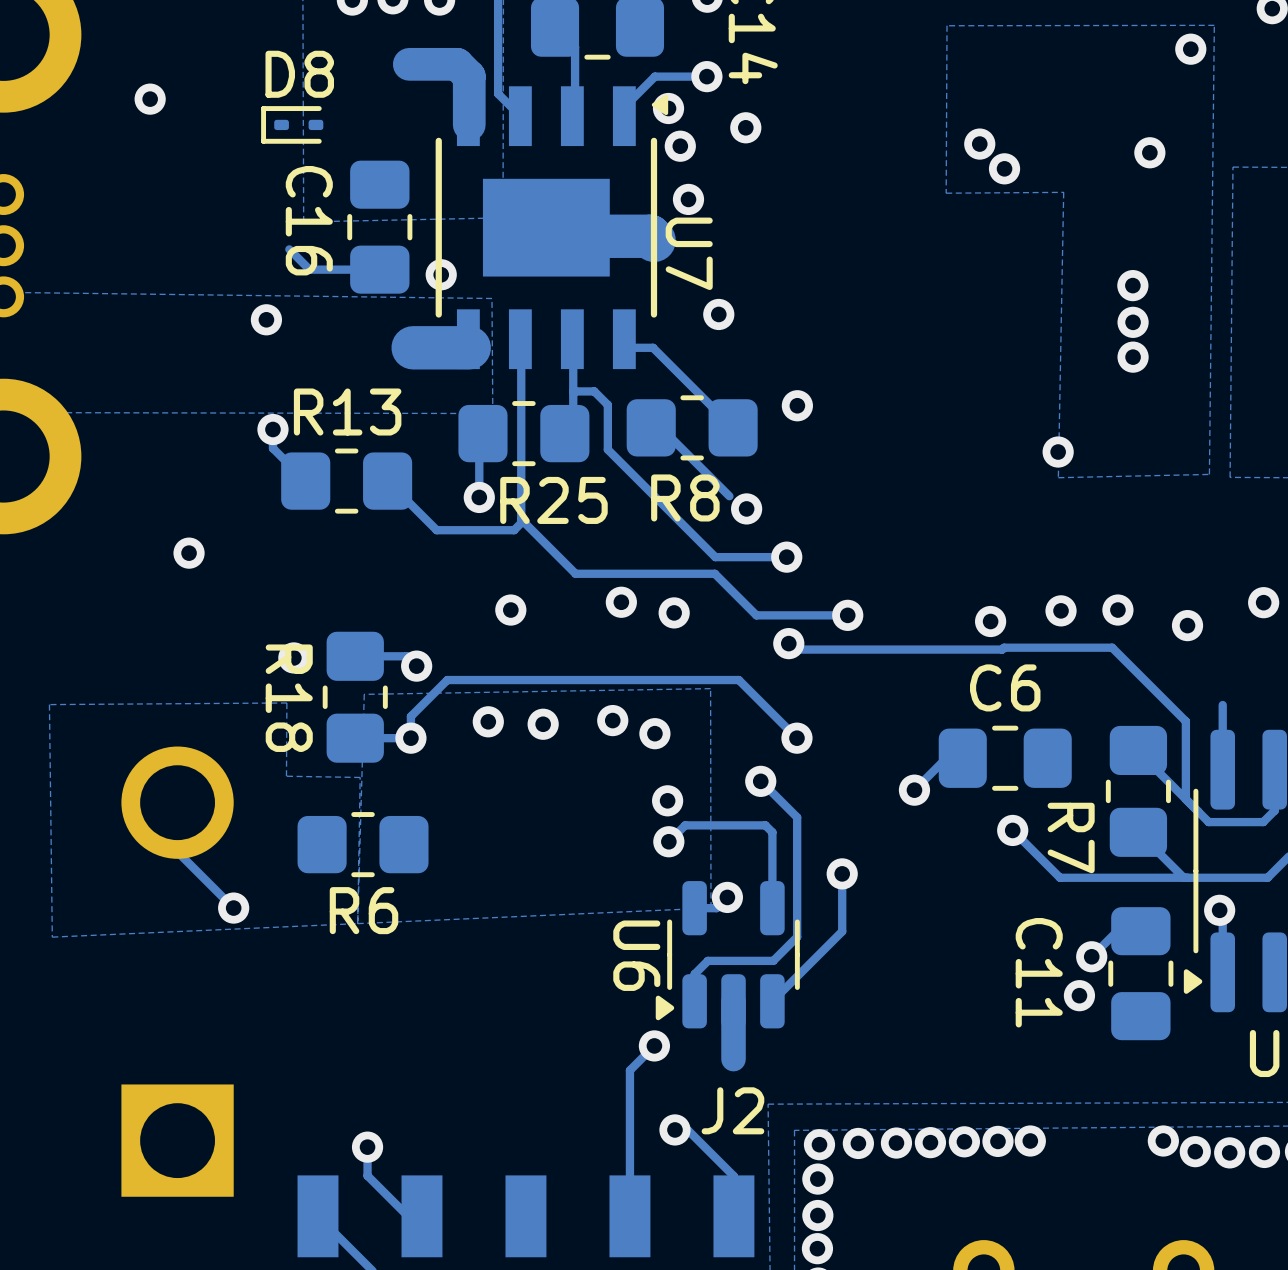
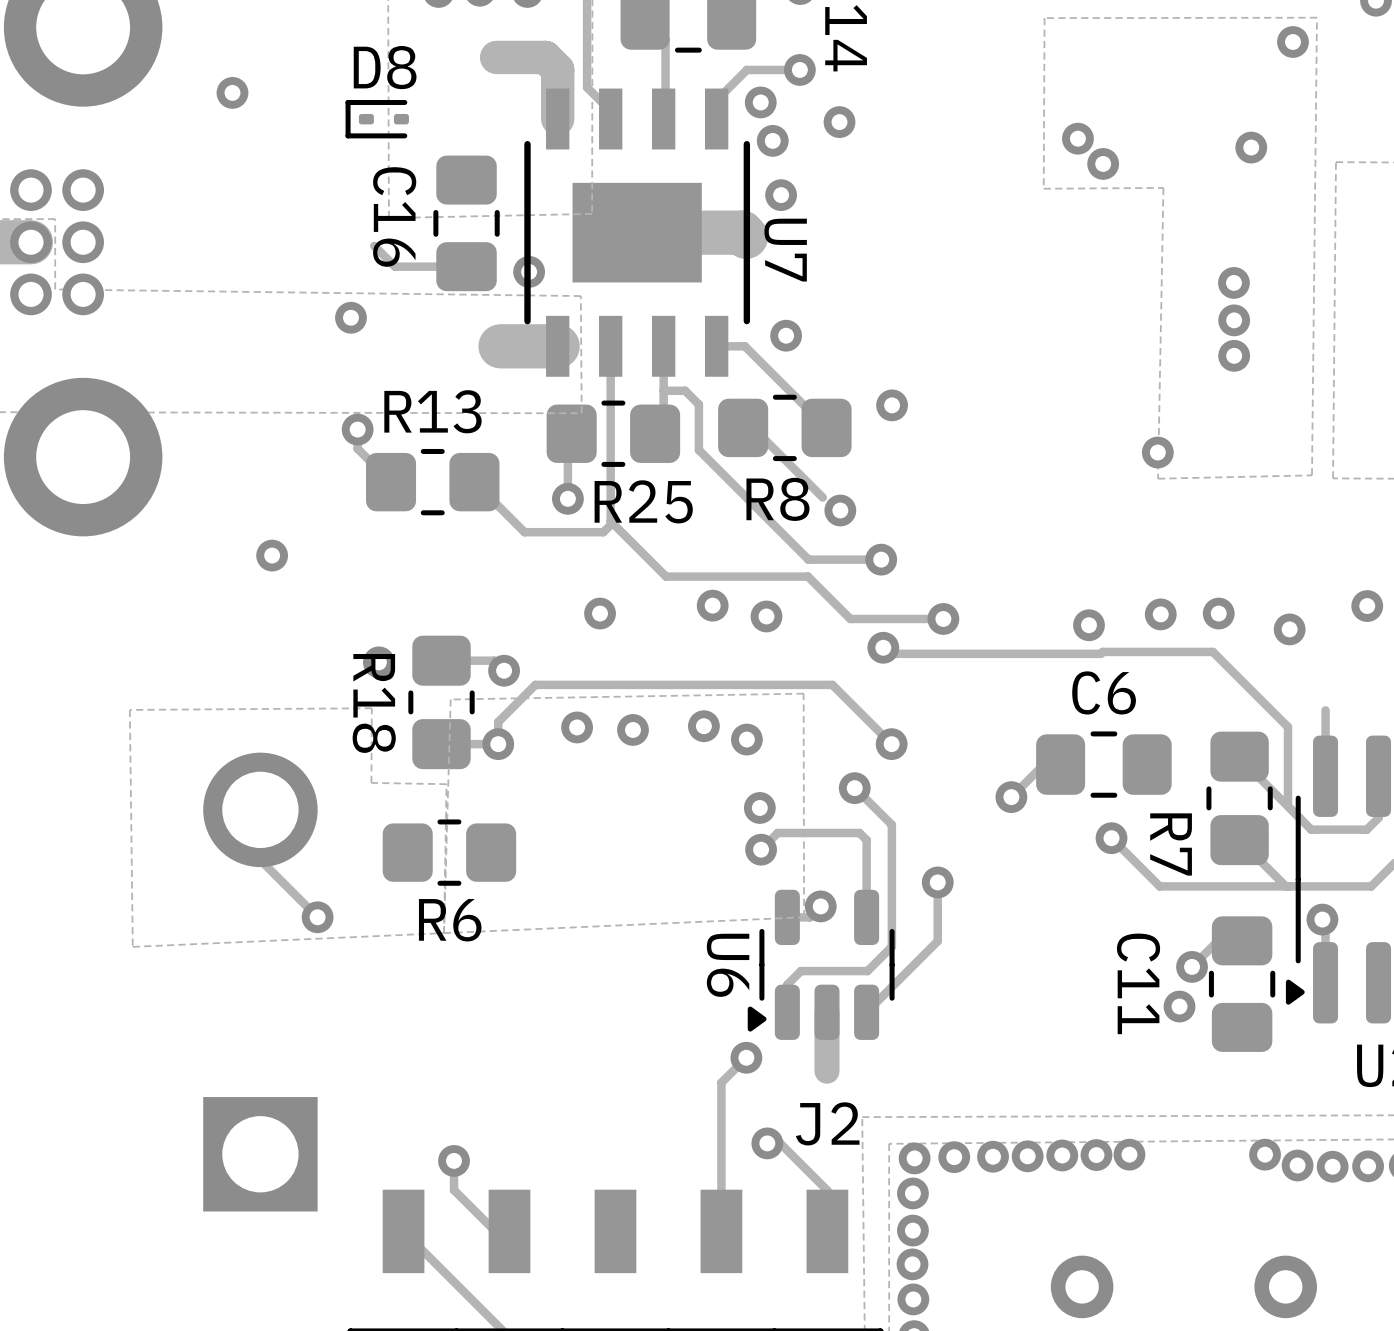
U7 footprint: [435, 86, 669, 370] -> [524, 88, 751, 377]
via position: (718, 314) -> (786, 335)

